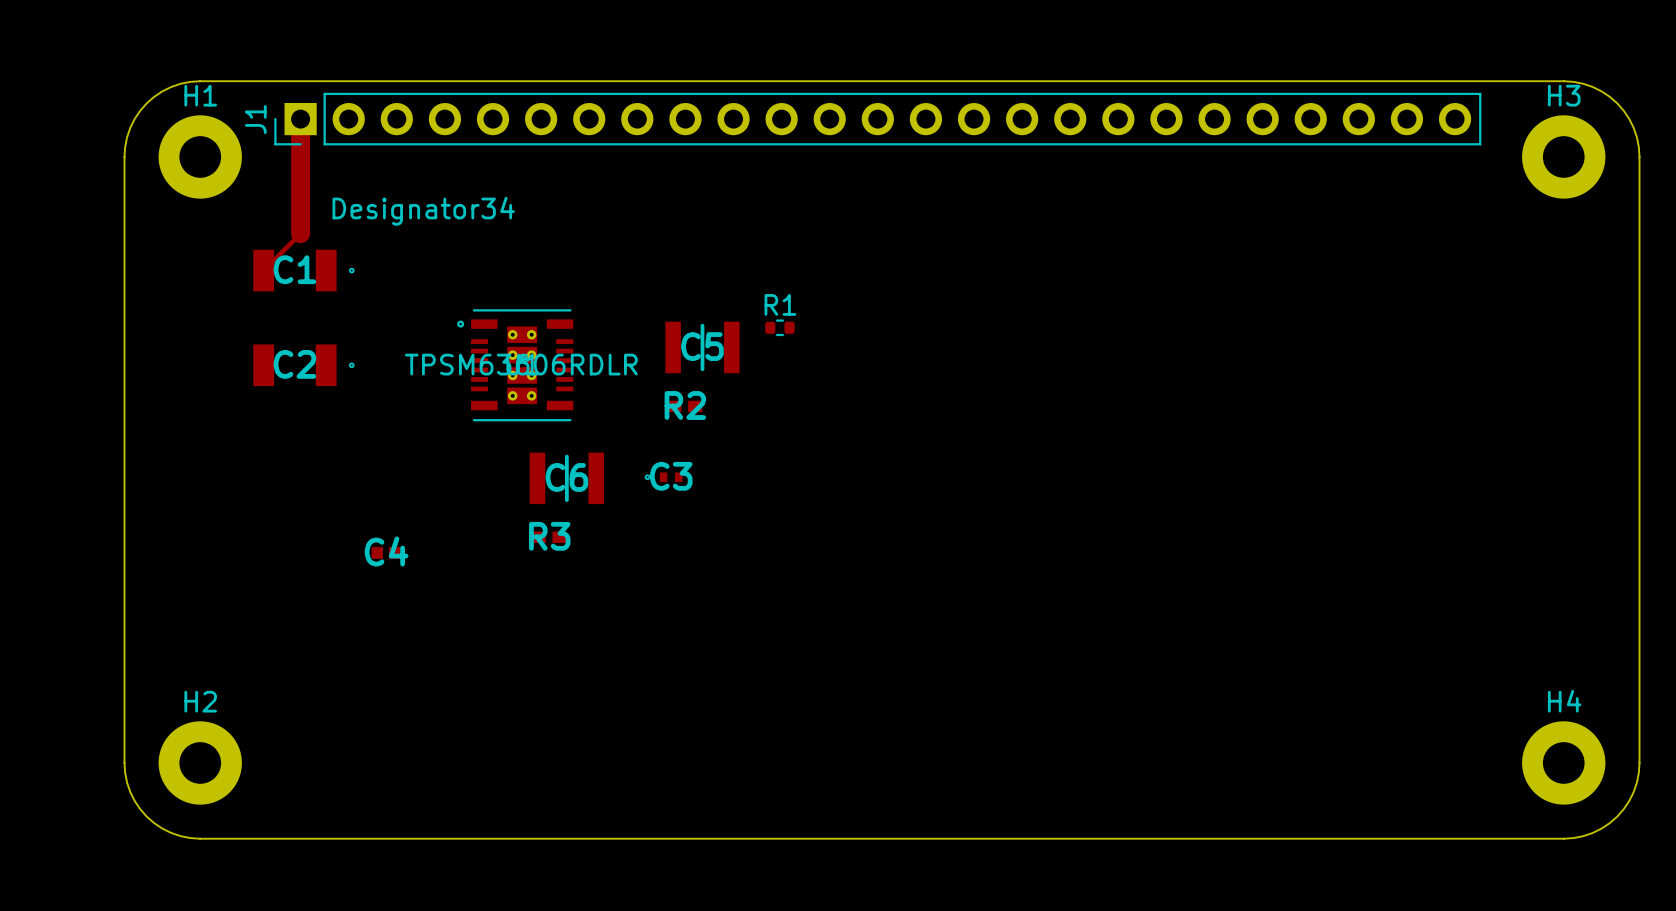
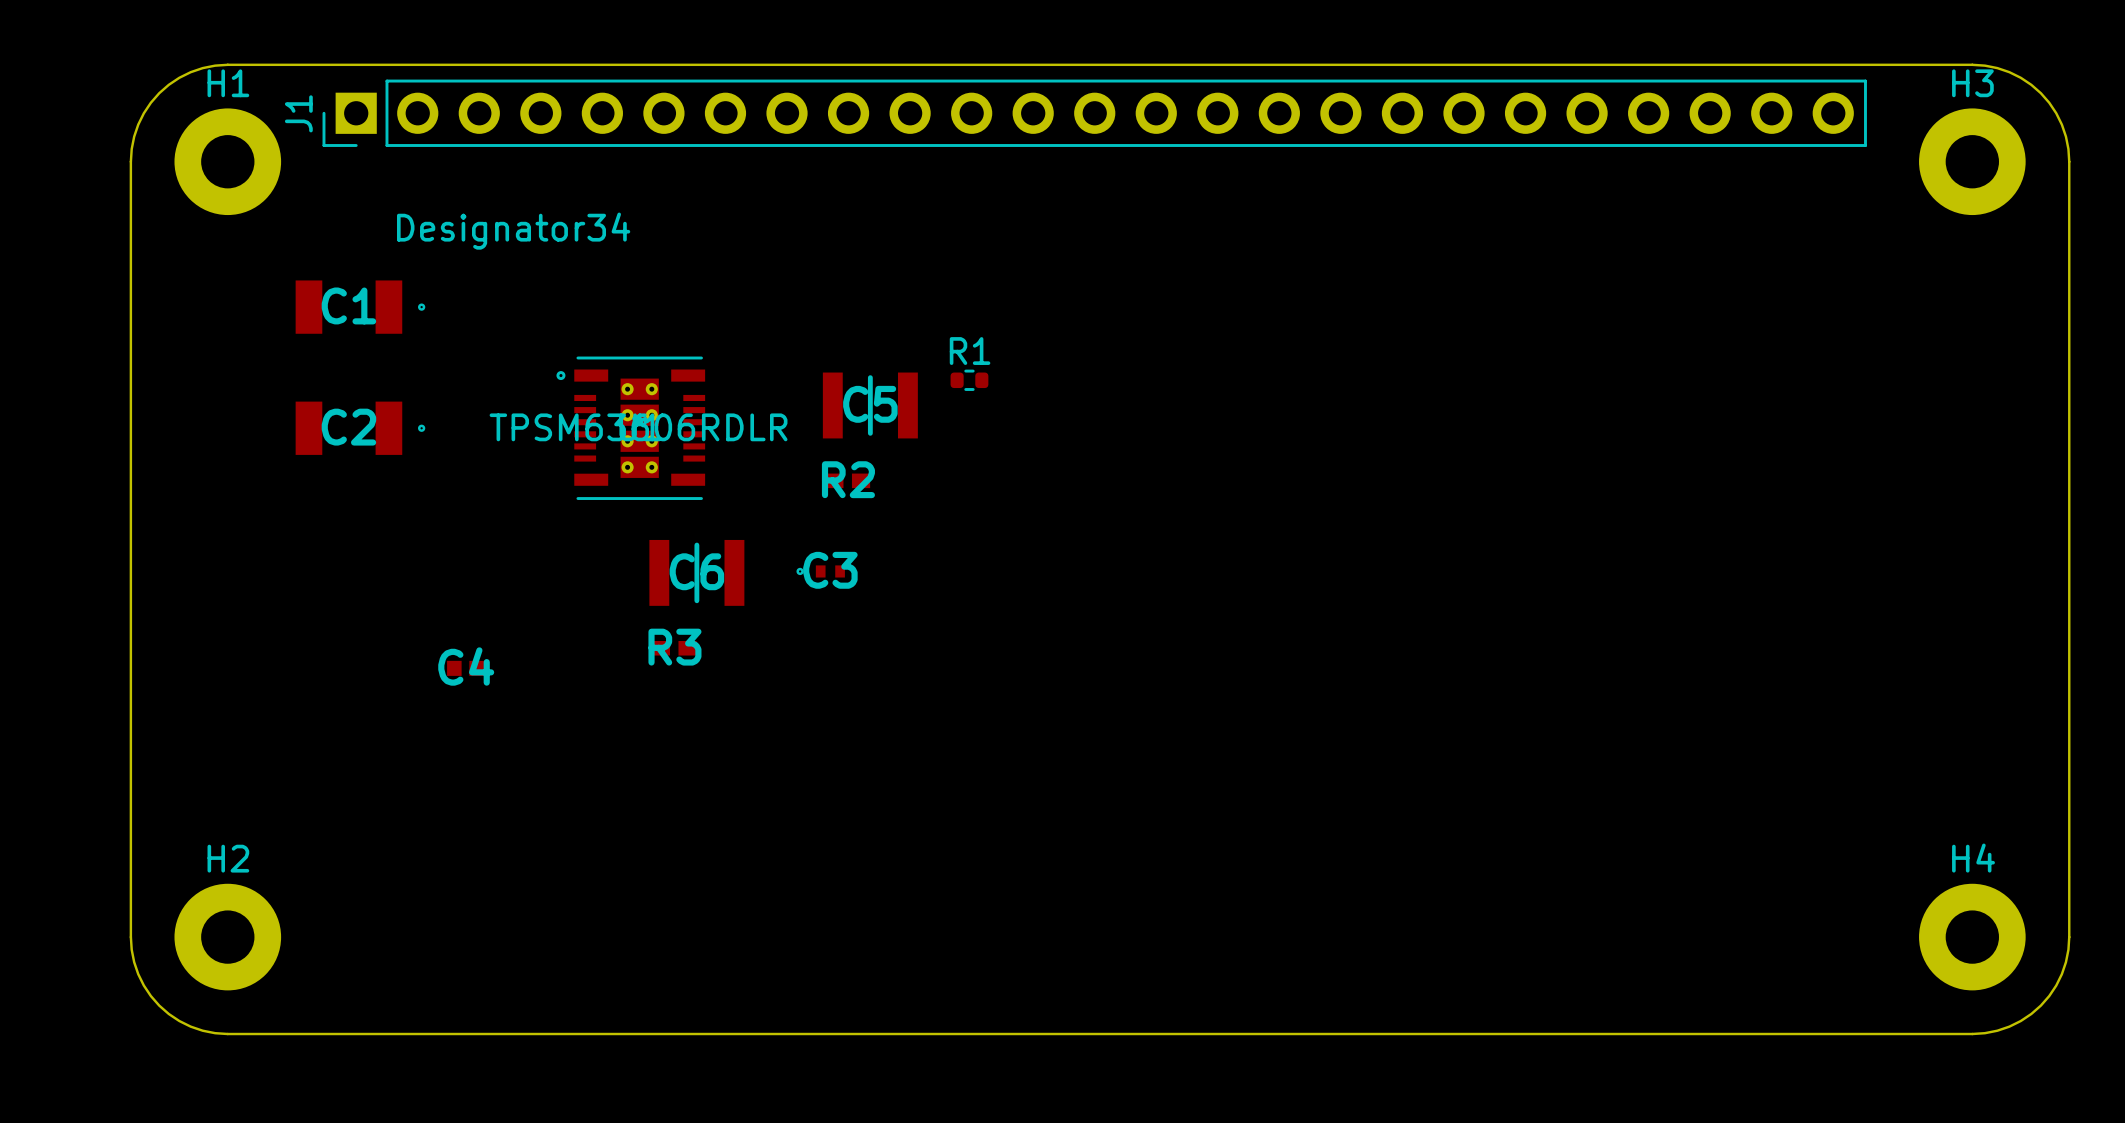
track: (300, 119) (300, 233) (263, 270) -> none

